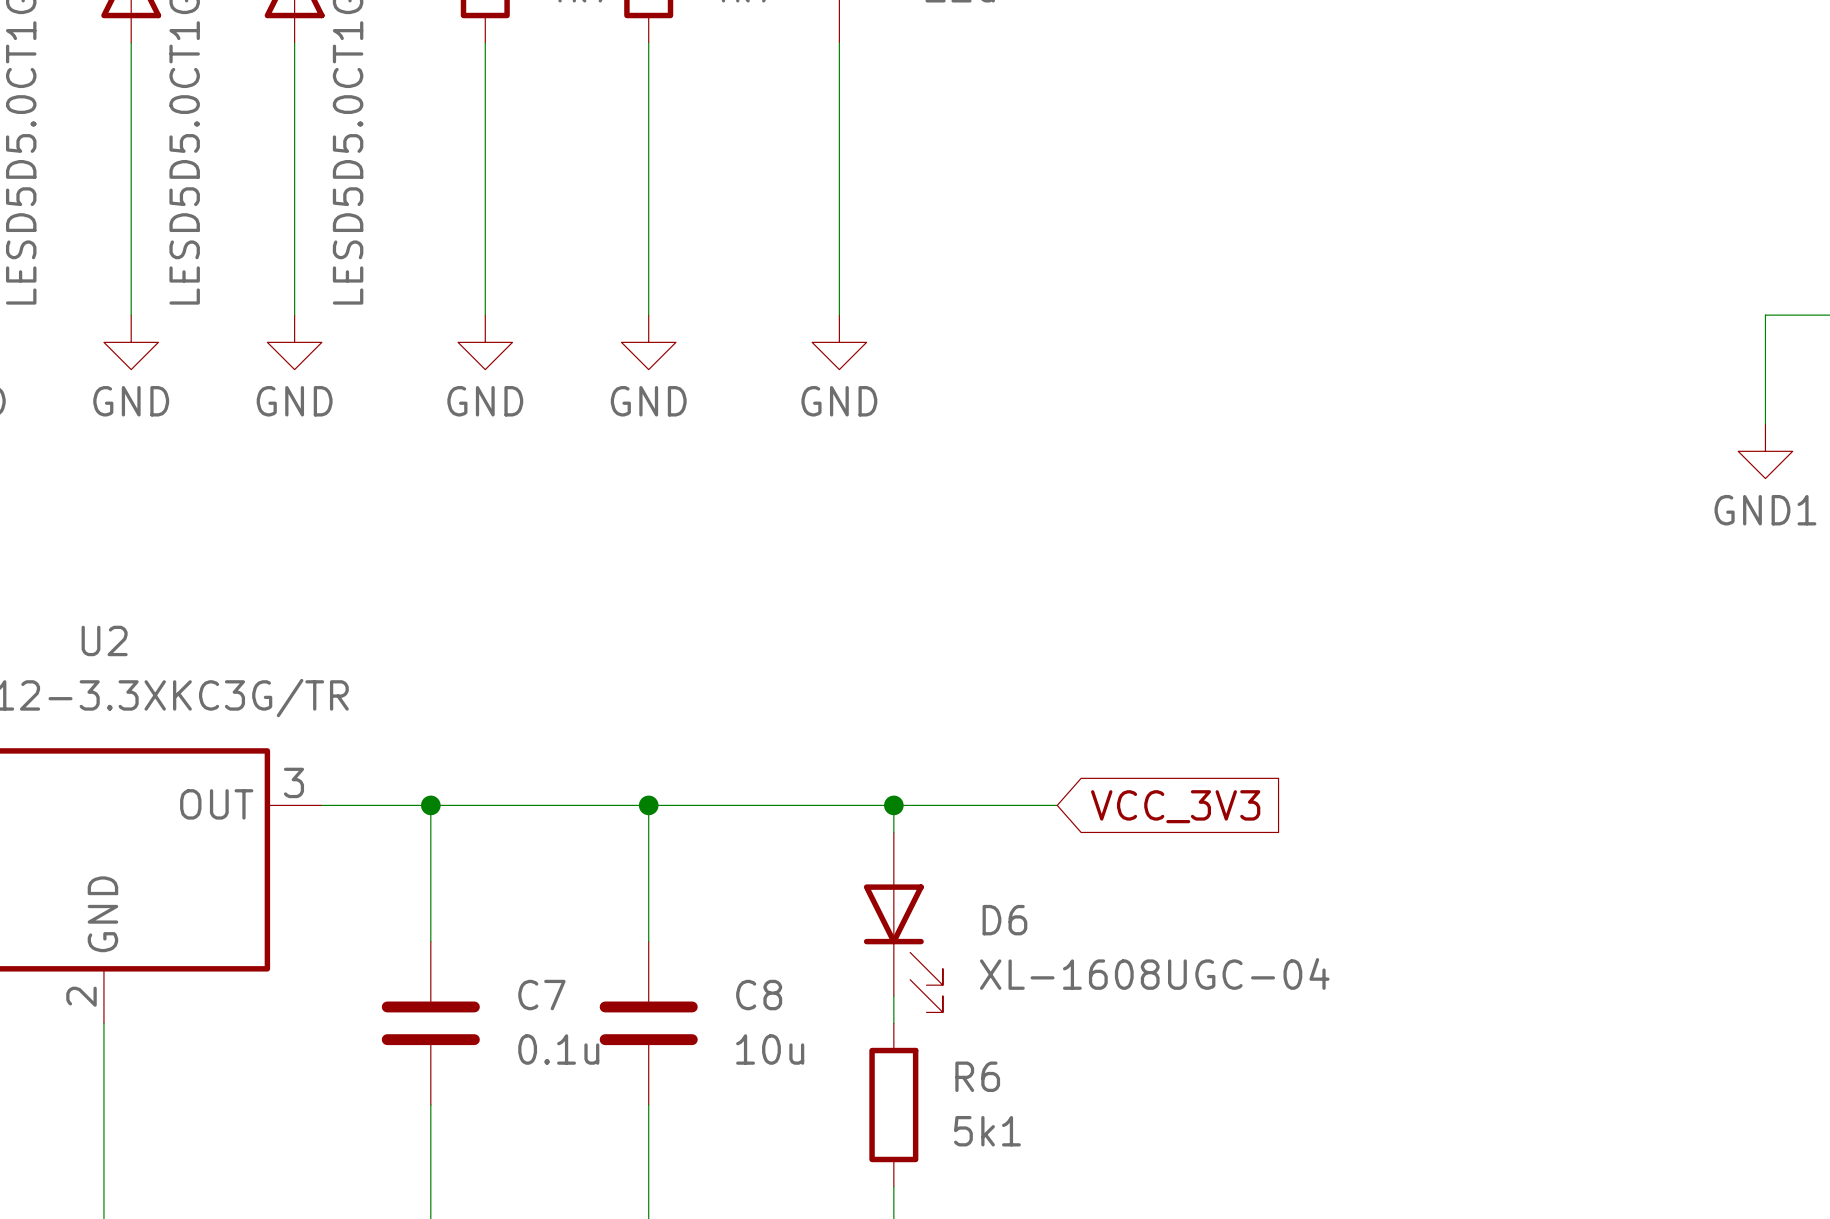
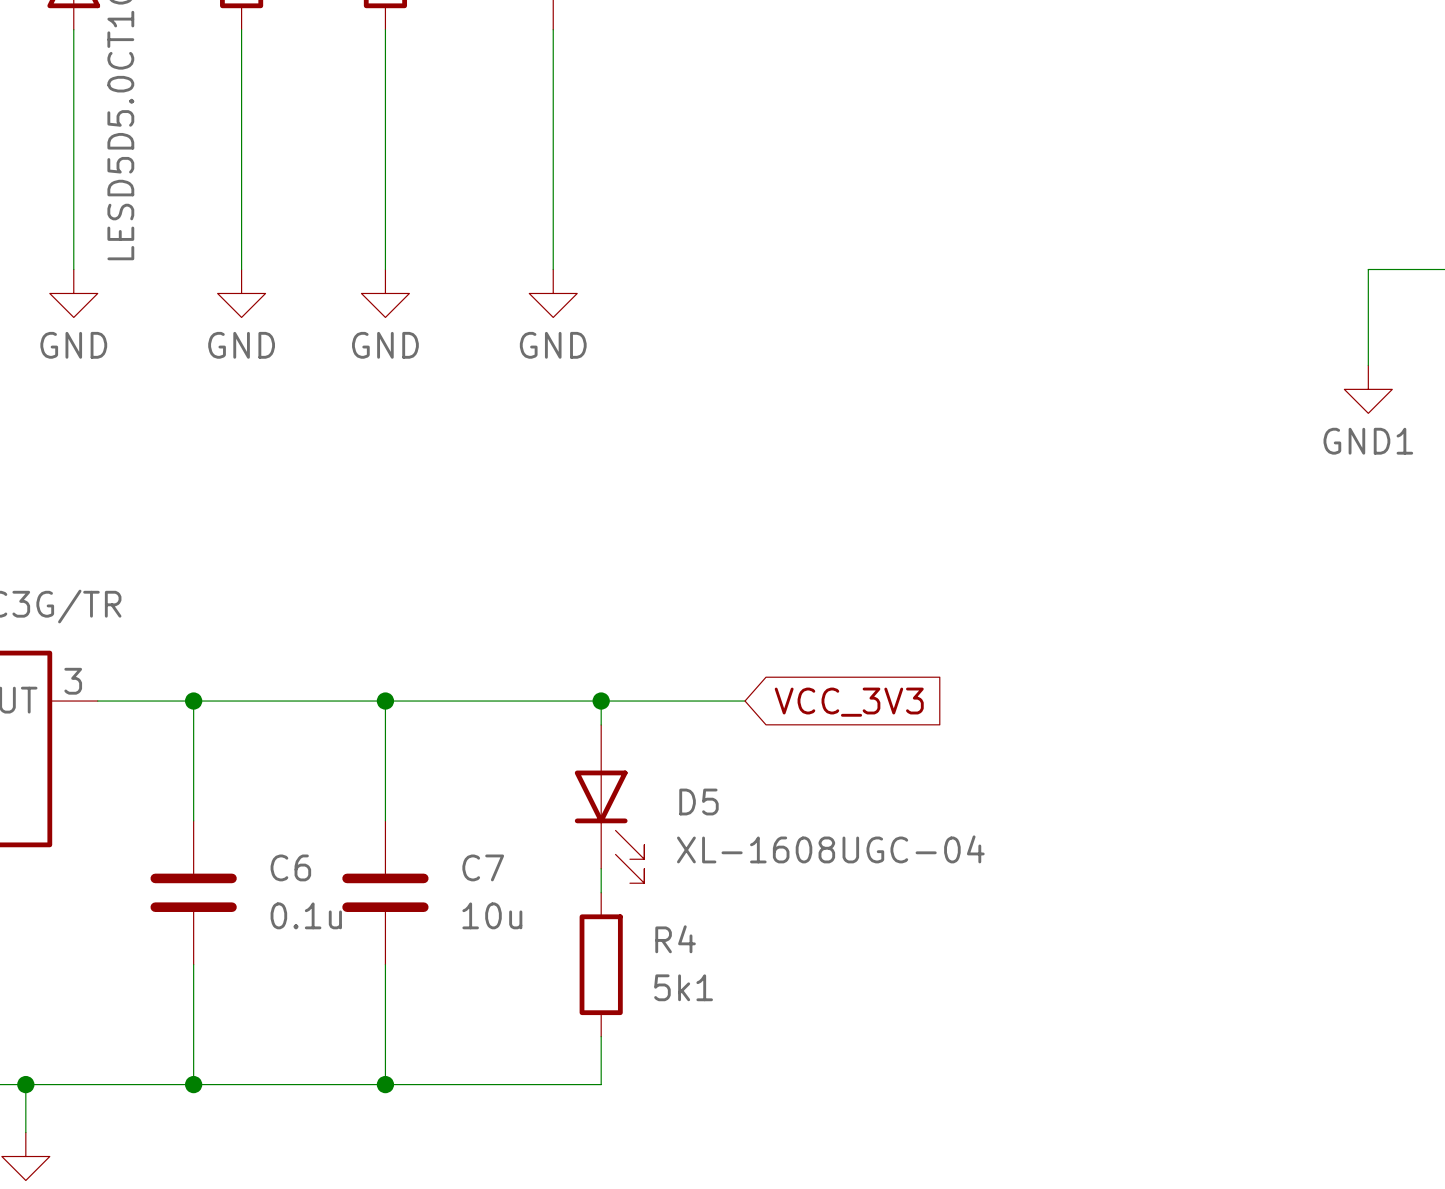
D6 name: D6 (1004, 920) -> D5 (698, 802)
C7 name: C7 (541, 995) -> C6 (290, 867)
C8 name: C8 (759, 995) -> C7 (483, 867)
R6 name: R6 (977, 1076) -> R4 (675, 939)

